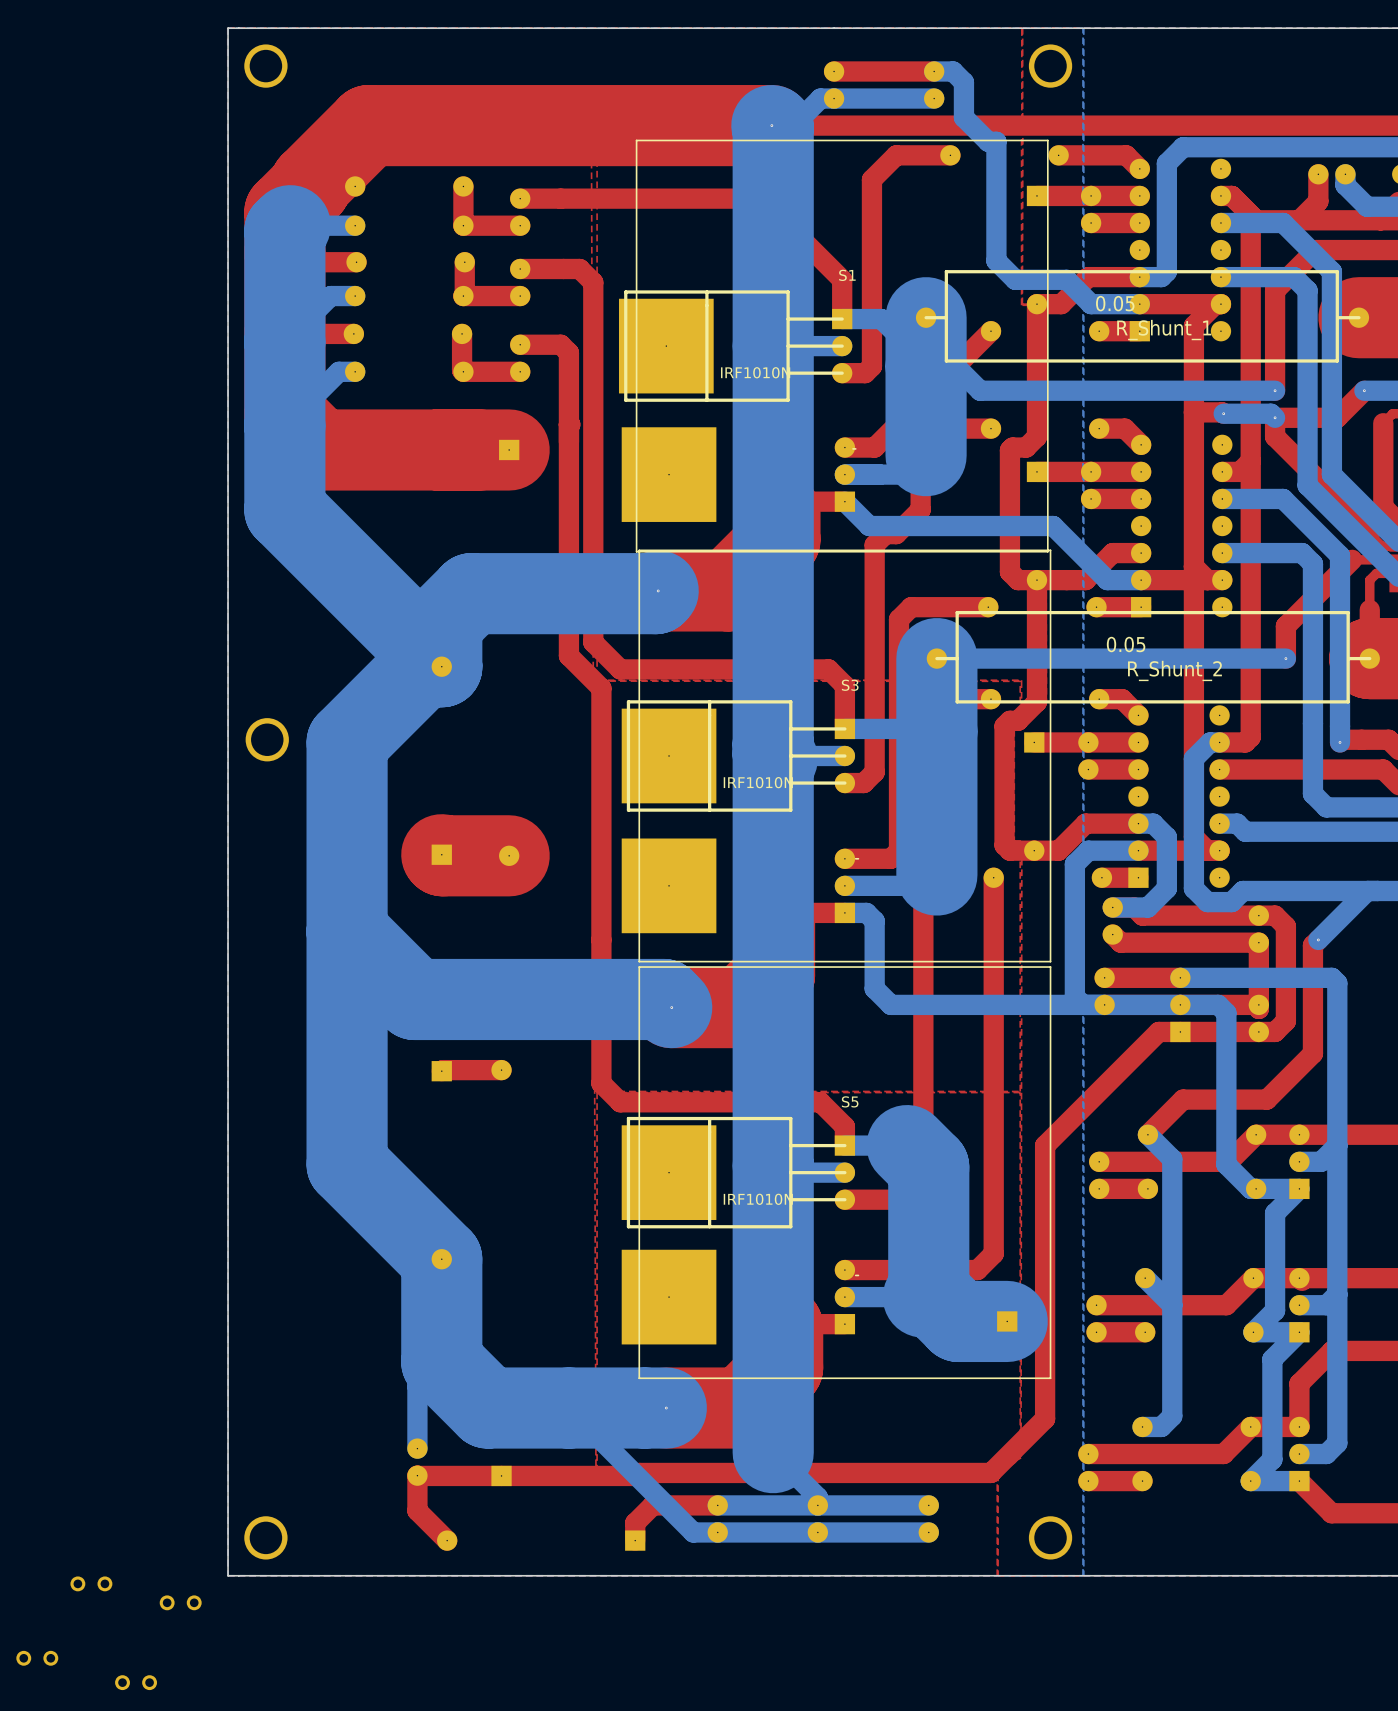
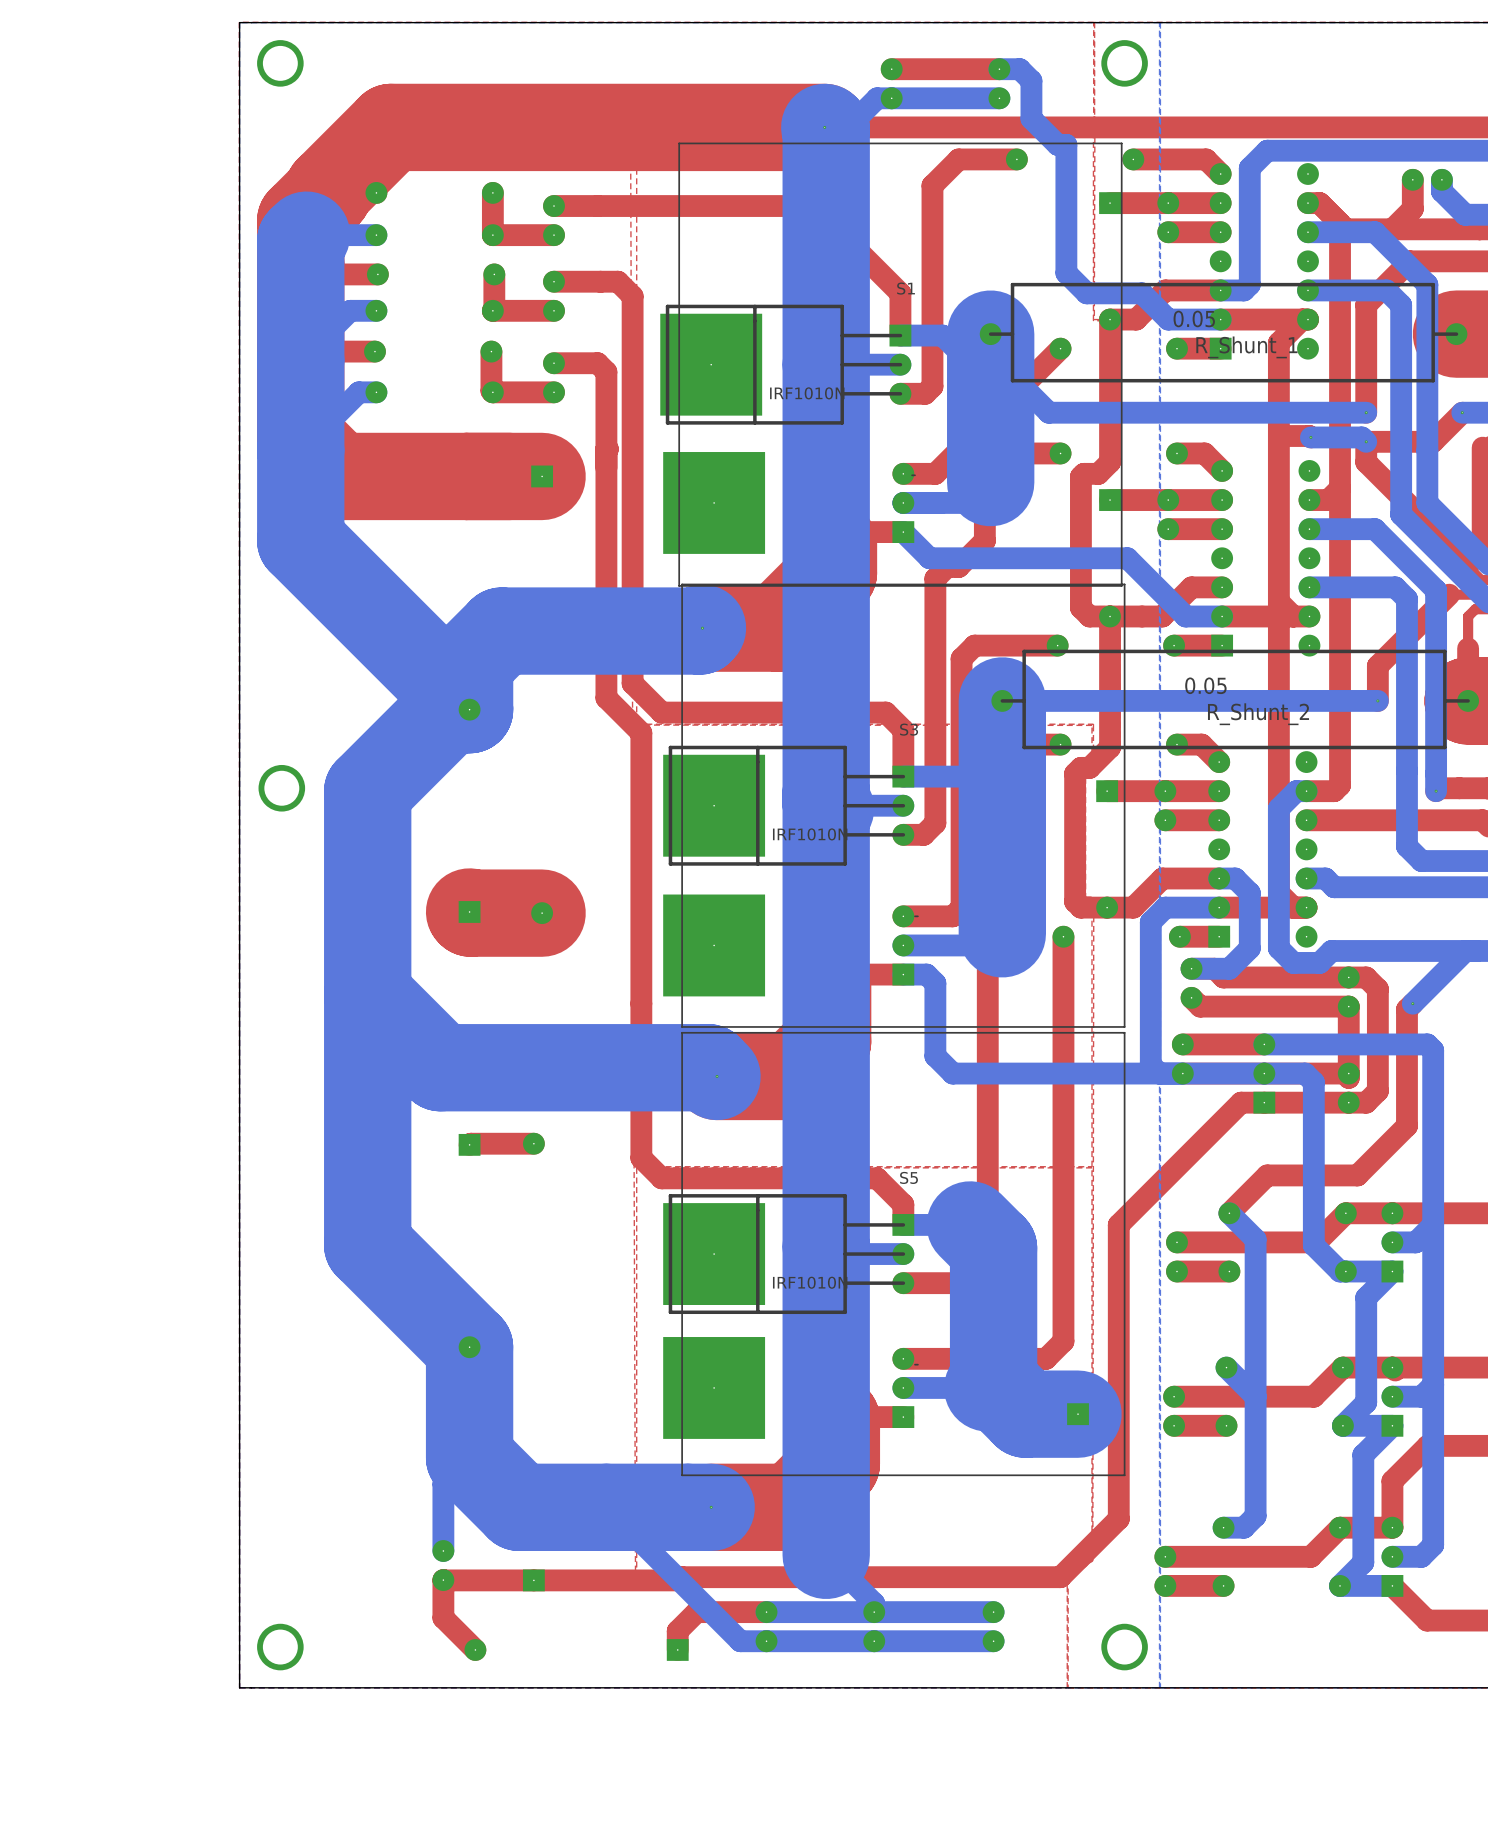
part: (91, 1583) -> none
part: (180, 1602) -> none
part: (37, 1658) -> none
part: (136, 1682) -> none

